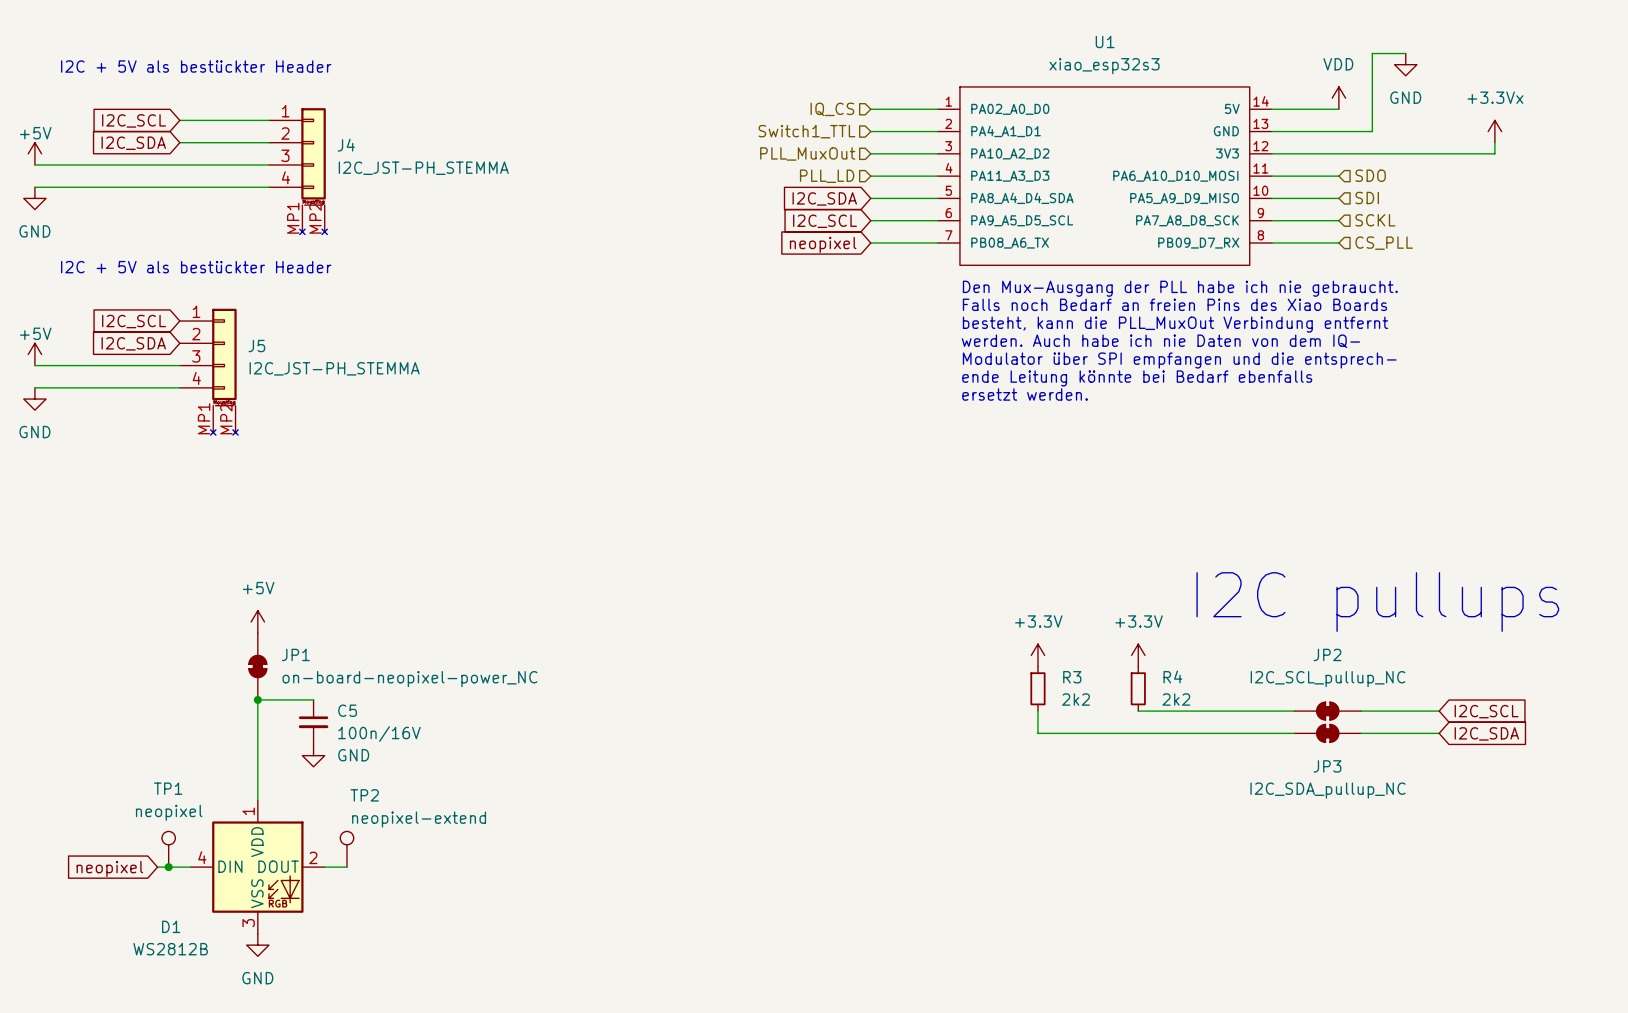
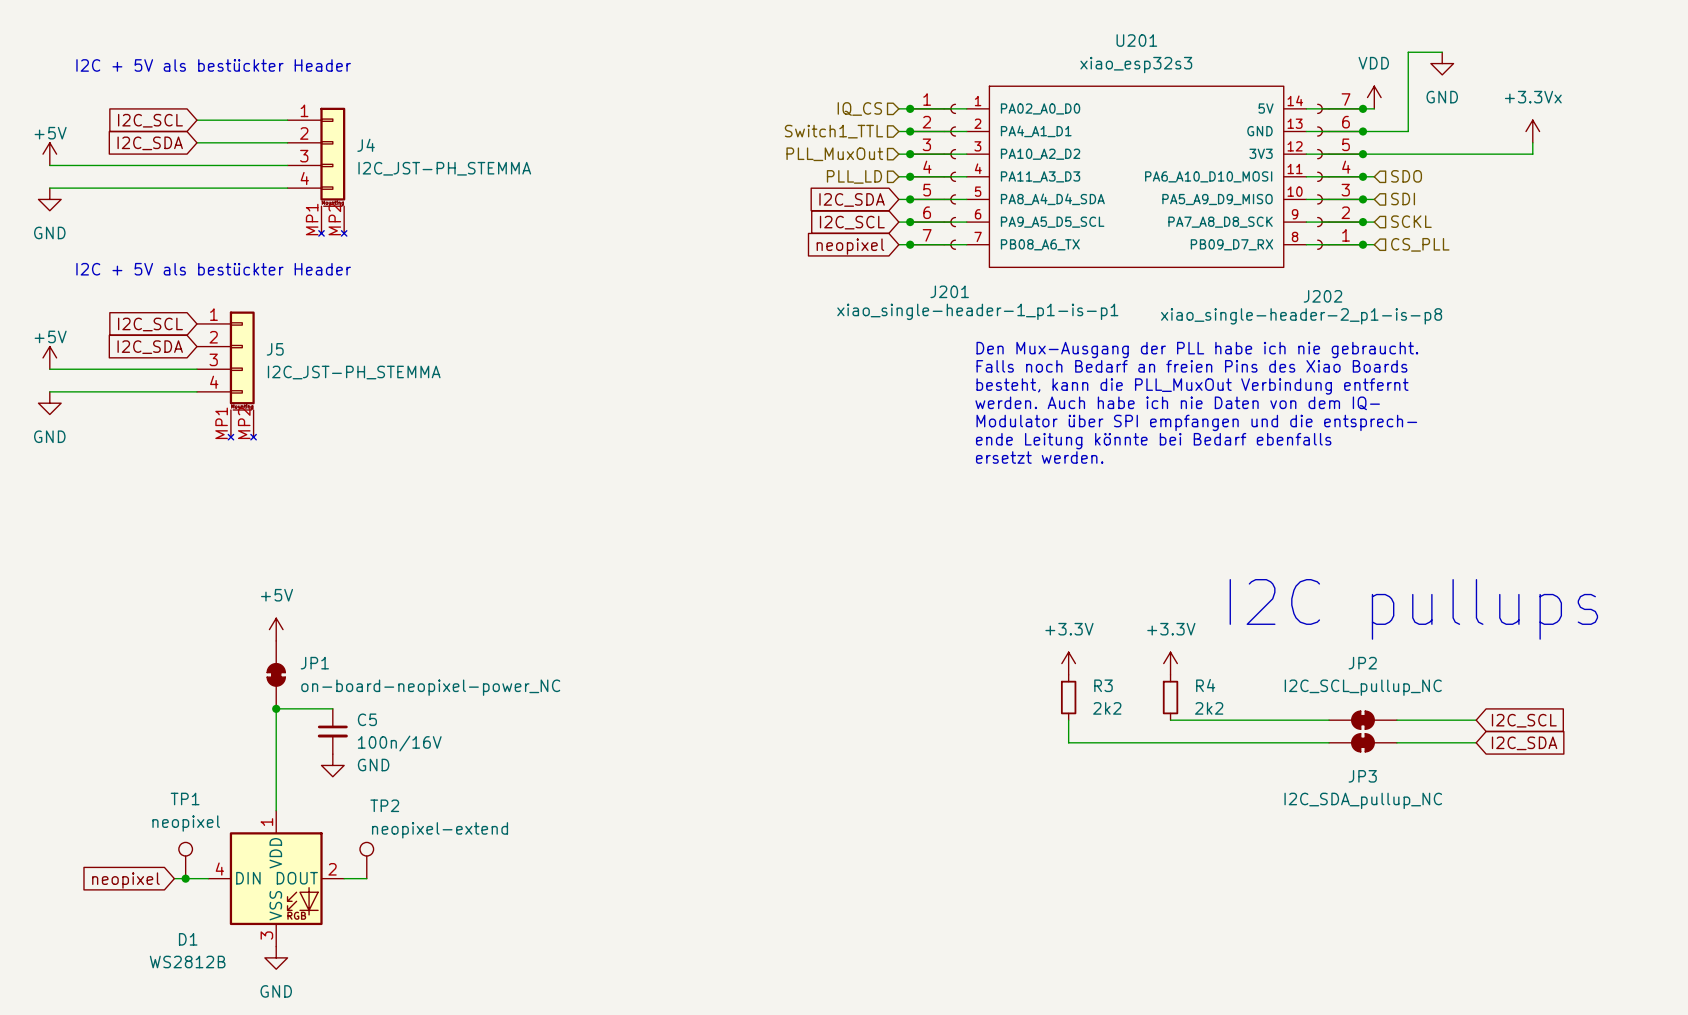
U1 name: U1 (1105, 41) -> U201 (1136, 40)
junction: none -> (910, 108)
junction: none -> (1362, 108)
junction: none -> (910, 131)
junction: none -> (1362, 131)
junction: none -> (910, 154)
junction: none -> (1362, 154)
junction: none -> (910, 176)
J201: none -> xiao_single-header-1_p1-is-p1 (933, 176)
J202: none -> xiao_single-header-2_p1-is-p8 (1340, 176)
junction: none -> (1362, 176)
junction: none -> (910, 199)
junction: none -> (1362, 199)
junction: none -> (910, 222)
junction: none -> (1362, 222)
junction: none -> (910, 244)
junction: none -> (1362, 244)
text position: Den Mux-Ausgang der PLL habe ich nie gebraucht. (1180, 288) -> Den Mux-Ausgang der PLL habe ich nie gebraucht. (1197, 350)
text position: Falls noch Bedarf an freien Pins des Xiao Boards (1174, 304) -> Falls noch Bedarf an freien Pins des Xiao Boards (1191, 366)
text position: besteht, kann die PLL_MuxOut Verbindung entfernt (1175, 324) -> besteht, kann die PLL_MuxOut Verbindung entfernt (1192, 386)
text position: werden. Auch habe ich nie Daten von dem IQ- (1160, 341) -> werden. Auch habe ich nie Daten von dem IQ- (1177, 403)
text position: Modulator über SPI empfangen und die entsprech- (1179, 360) -> Modulator über SPI empfangen und die entsprech- (1196, 422)
text position: ende Leitung könnte bei Bedarf ebenfalls (1137, 378) -> ende Leitung könnte bei Bedarf ebenfalls (1153, 441)
text position: ersetzt werden. (1025, 394) -> ersetzt werden. (1039, 457)

